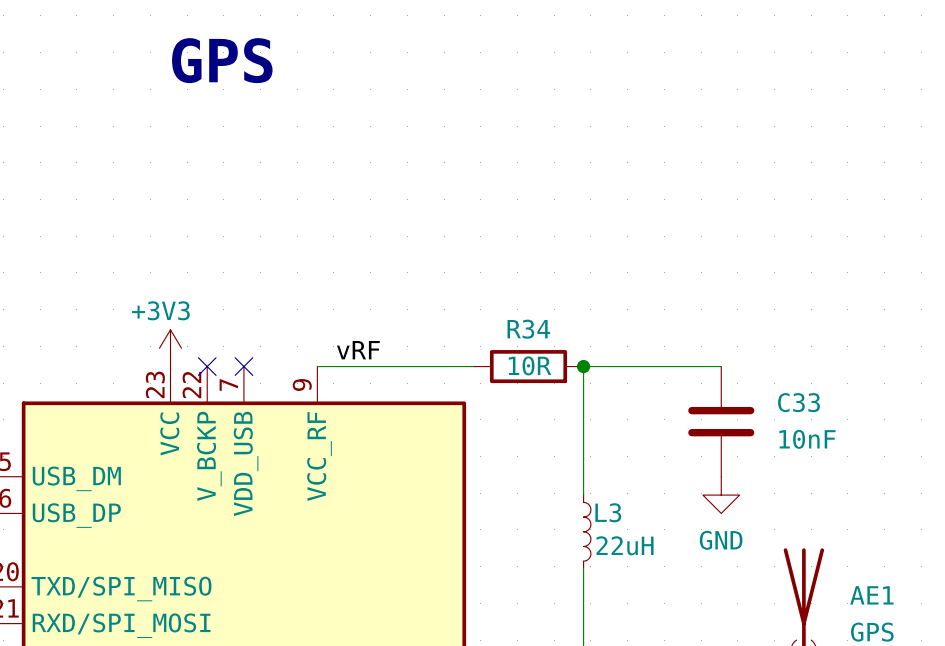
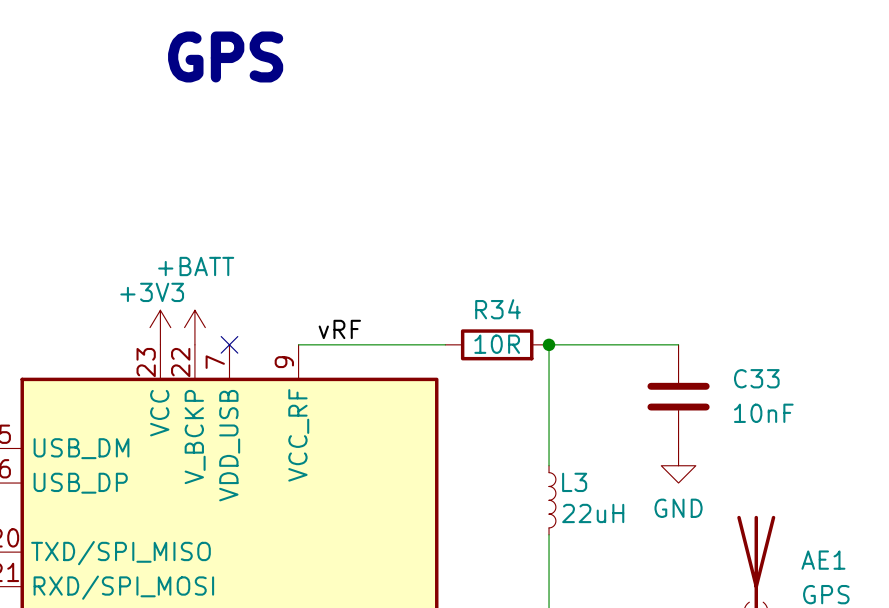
power symbol: none -> +BATT (194, 327)
no-connect mark: (207, 366) -> none

